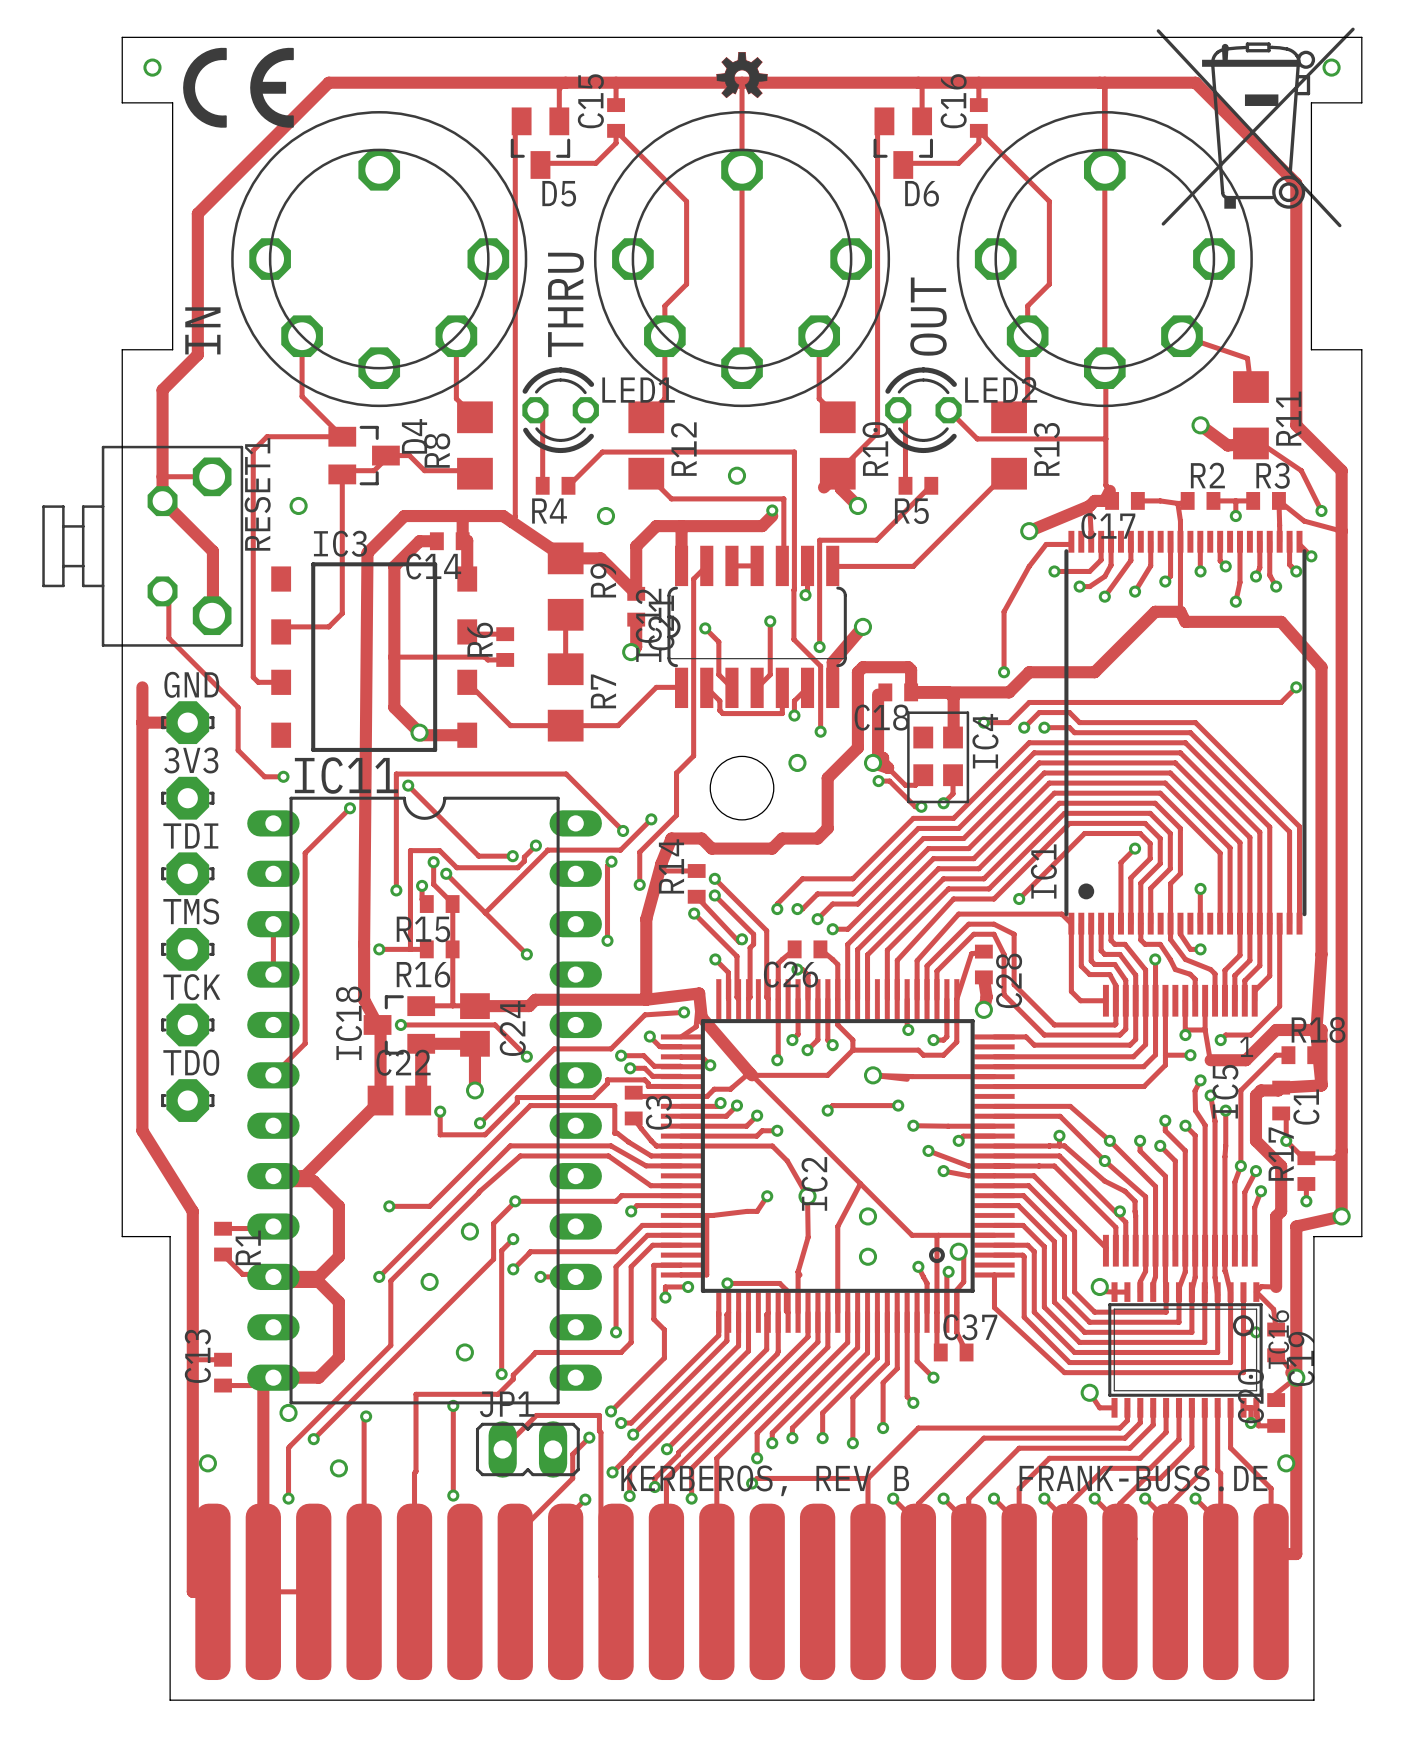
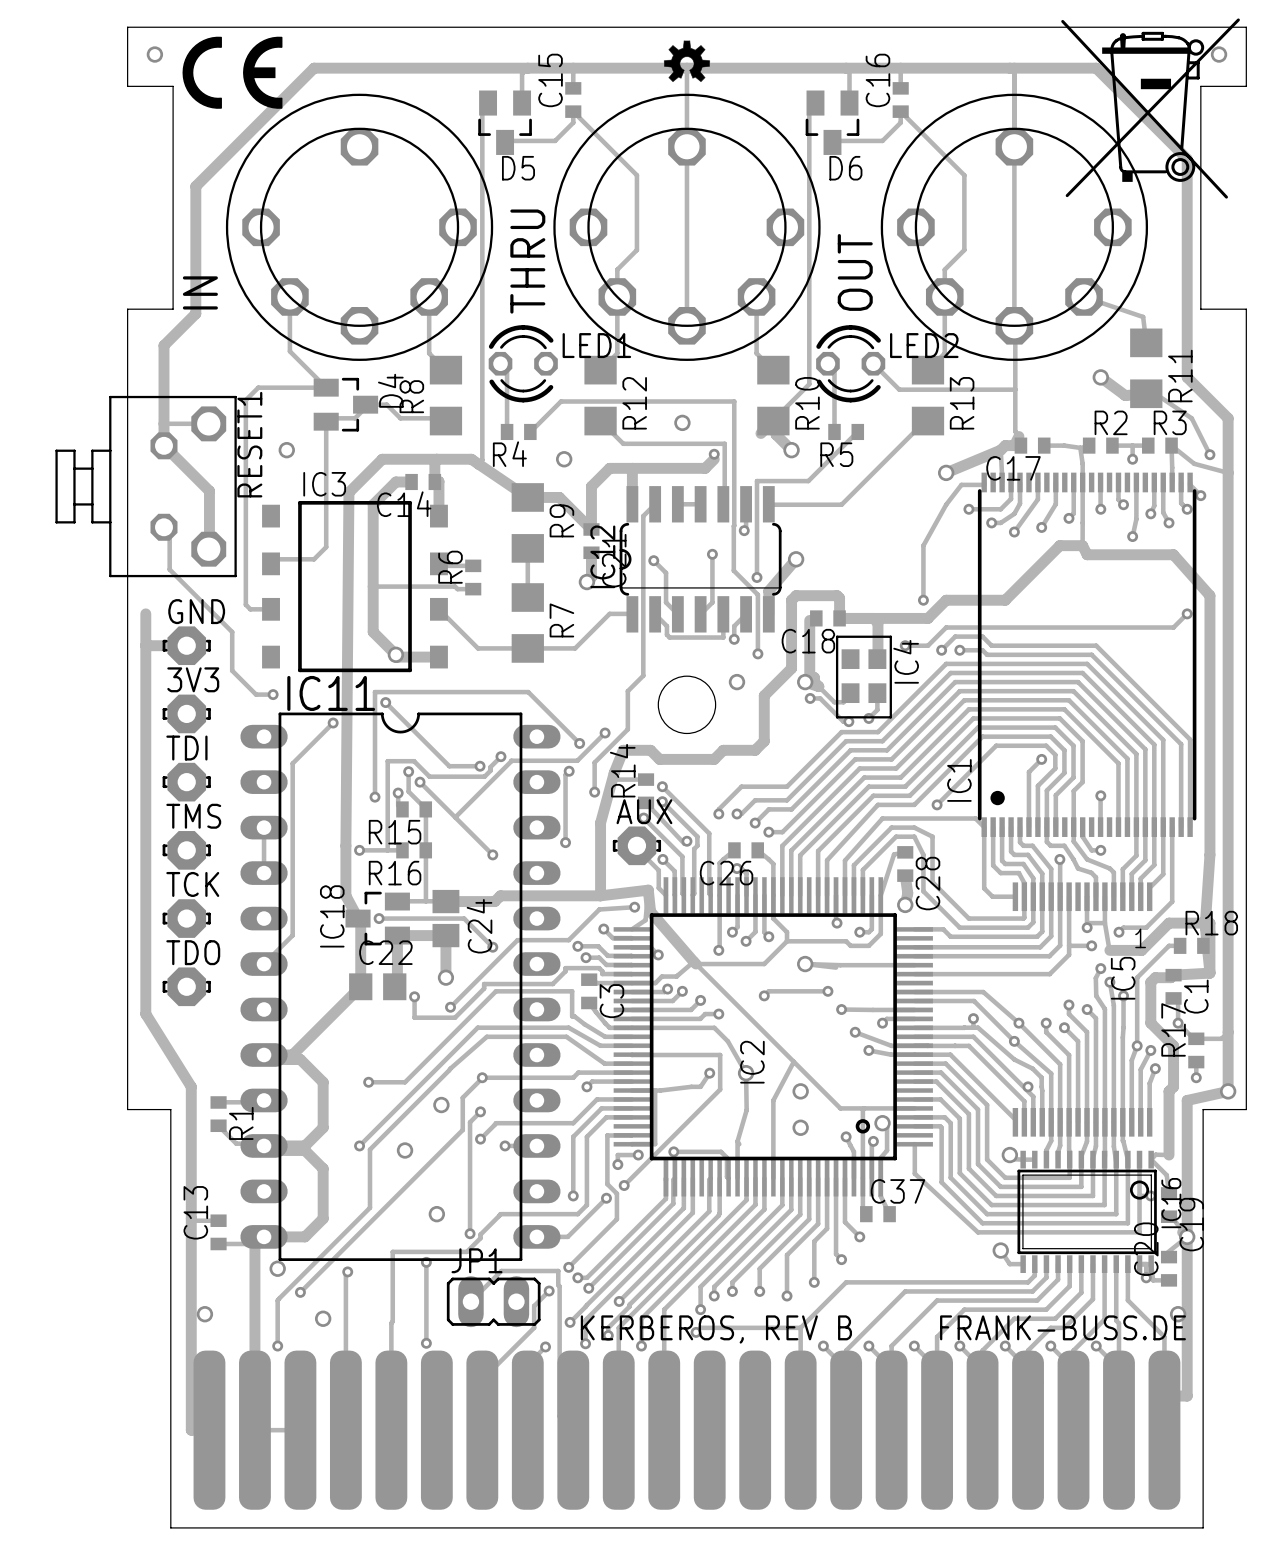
track: none -> (636, 845) (636, 848) (658, 870) (658, 888) (665, 895)
AUX: none -> (636, 845)
track: none -> (631, 1054) (720, 1054) (720, 1089) (624, 1185)
via: none -> (624, 1185)
track: none -> (606, 1198) (567, 1236) (536, 1236)
via: none -> (606, 1198)

